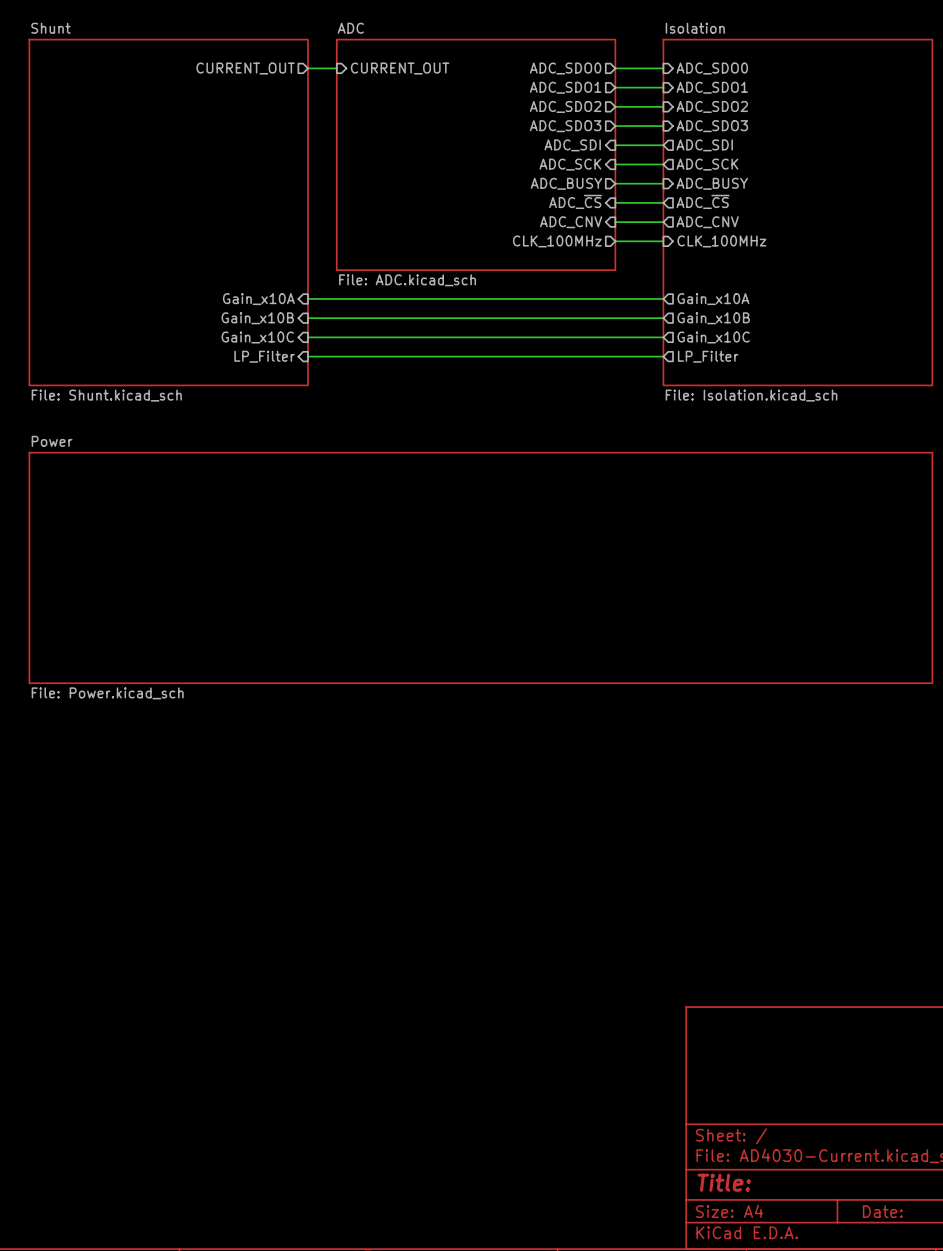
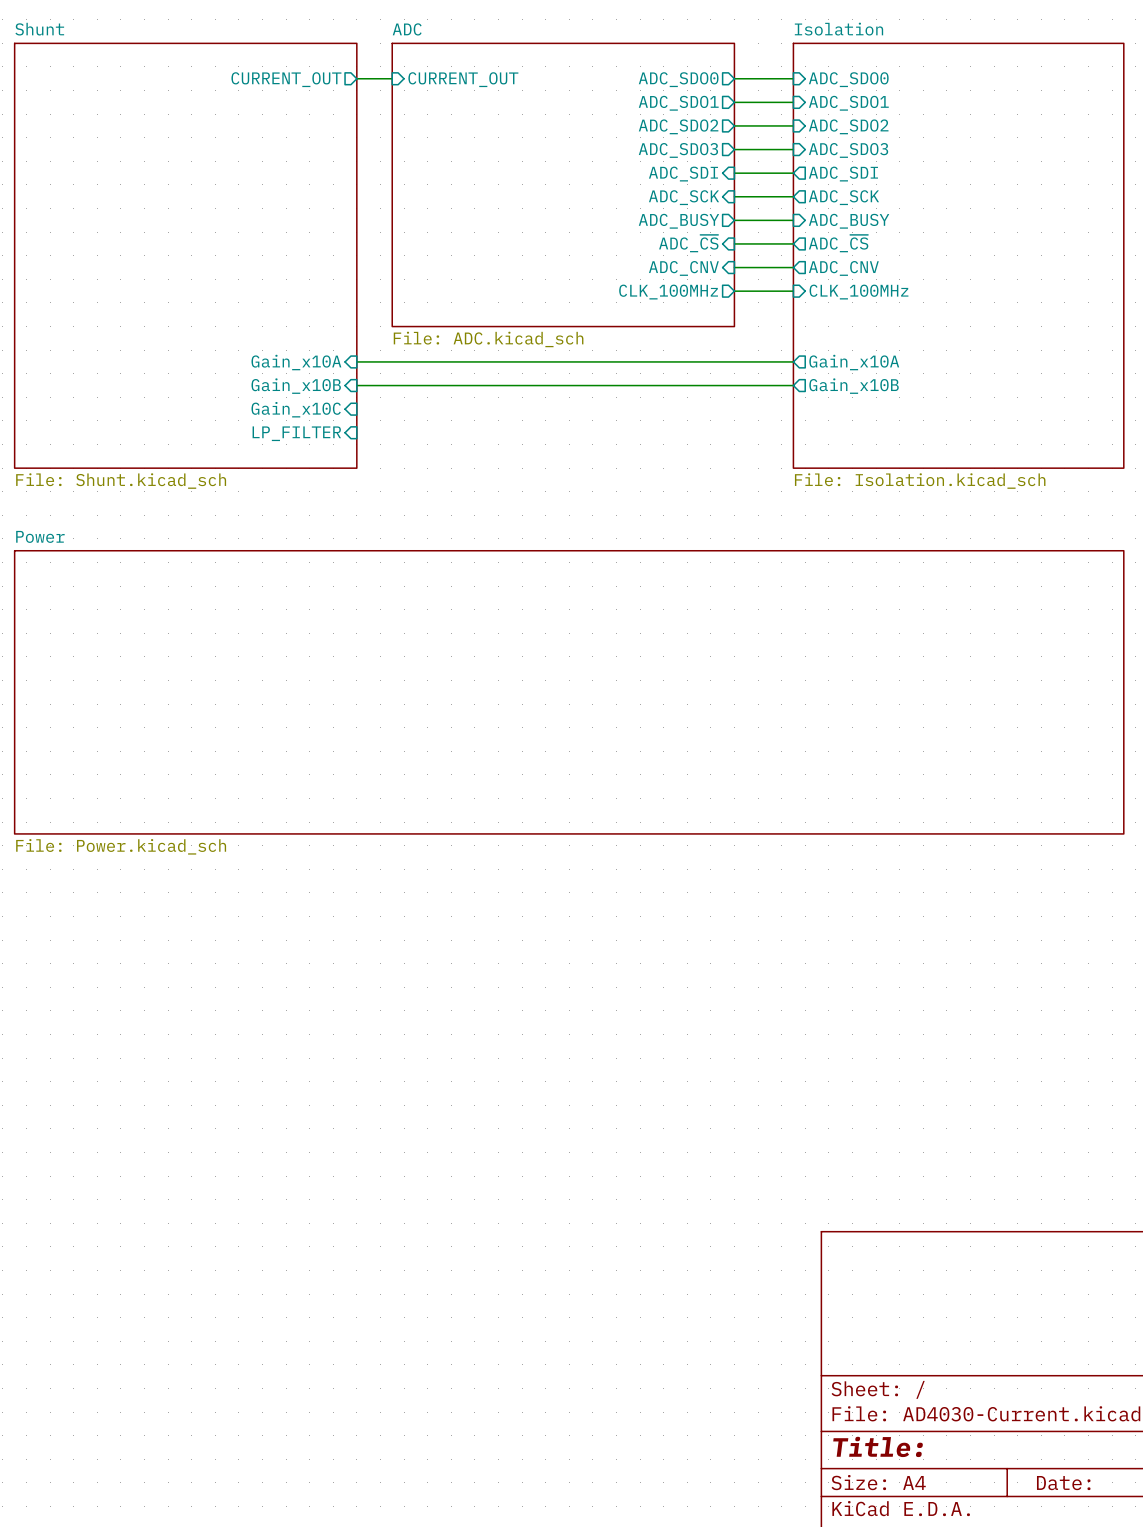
wire: (307, 337) (663, 337) -> none
sheet pin: Gain_x10C (713, 337) -> none
sheet pin: LP_Filter (264, 356) -> LP_FILTER (296, 433)
wire: (307, 356) (663, 356) -> none
sheet pin: LP_Filter (708, 356) -> none

